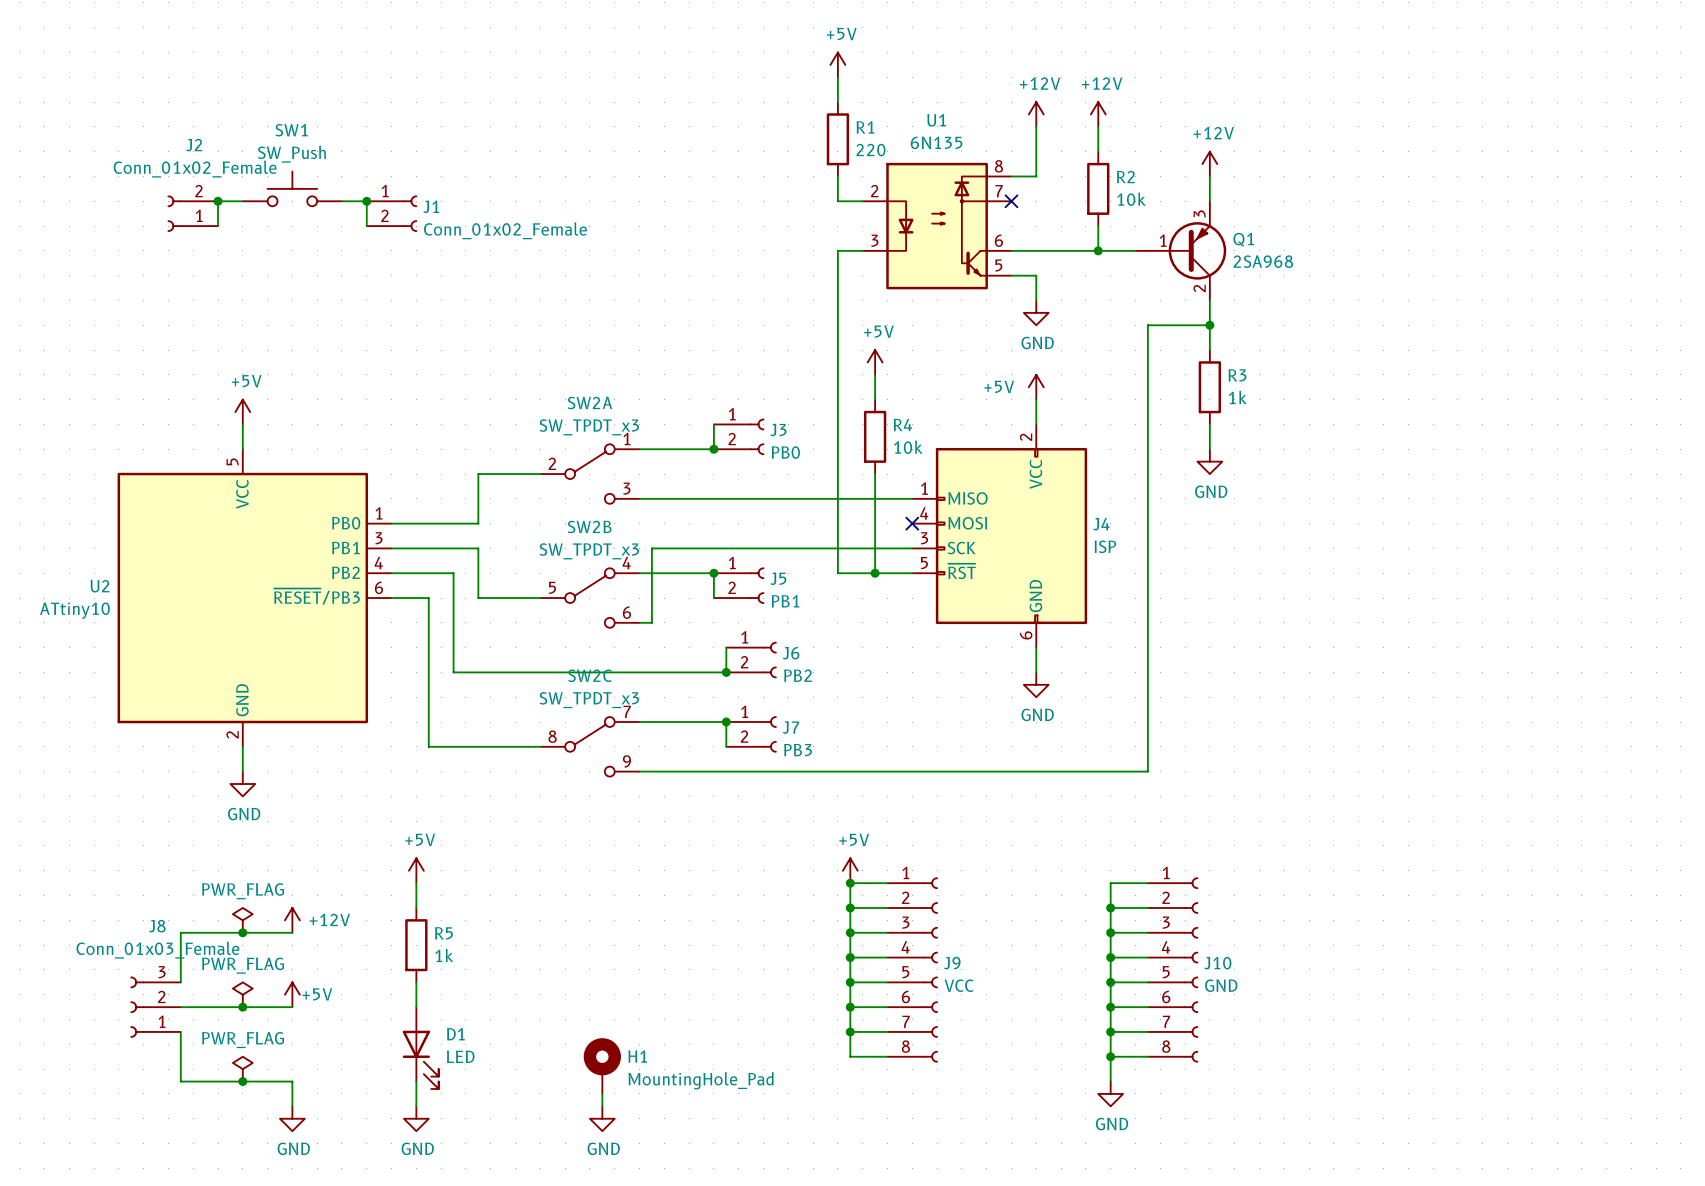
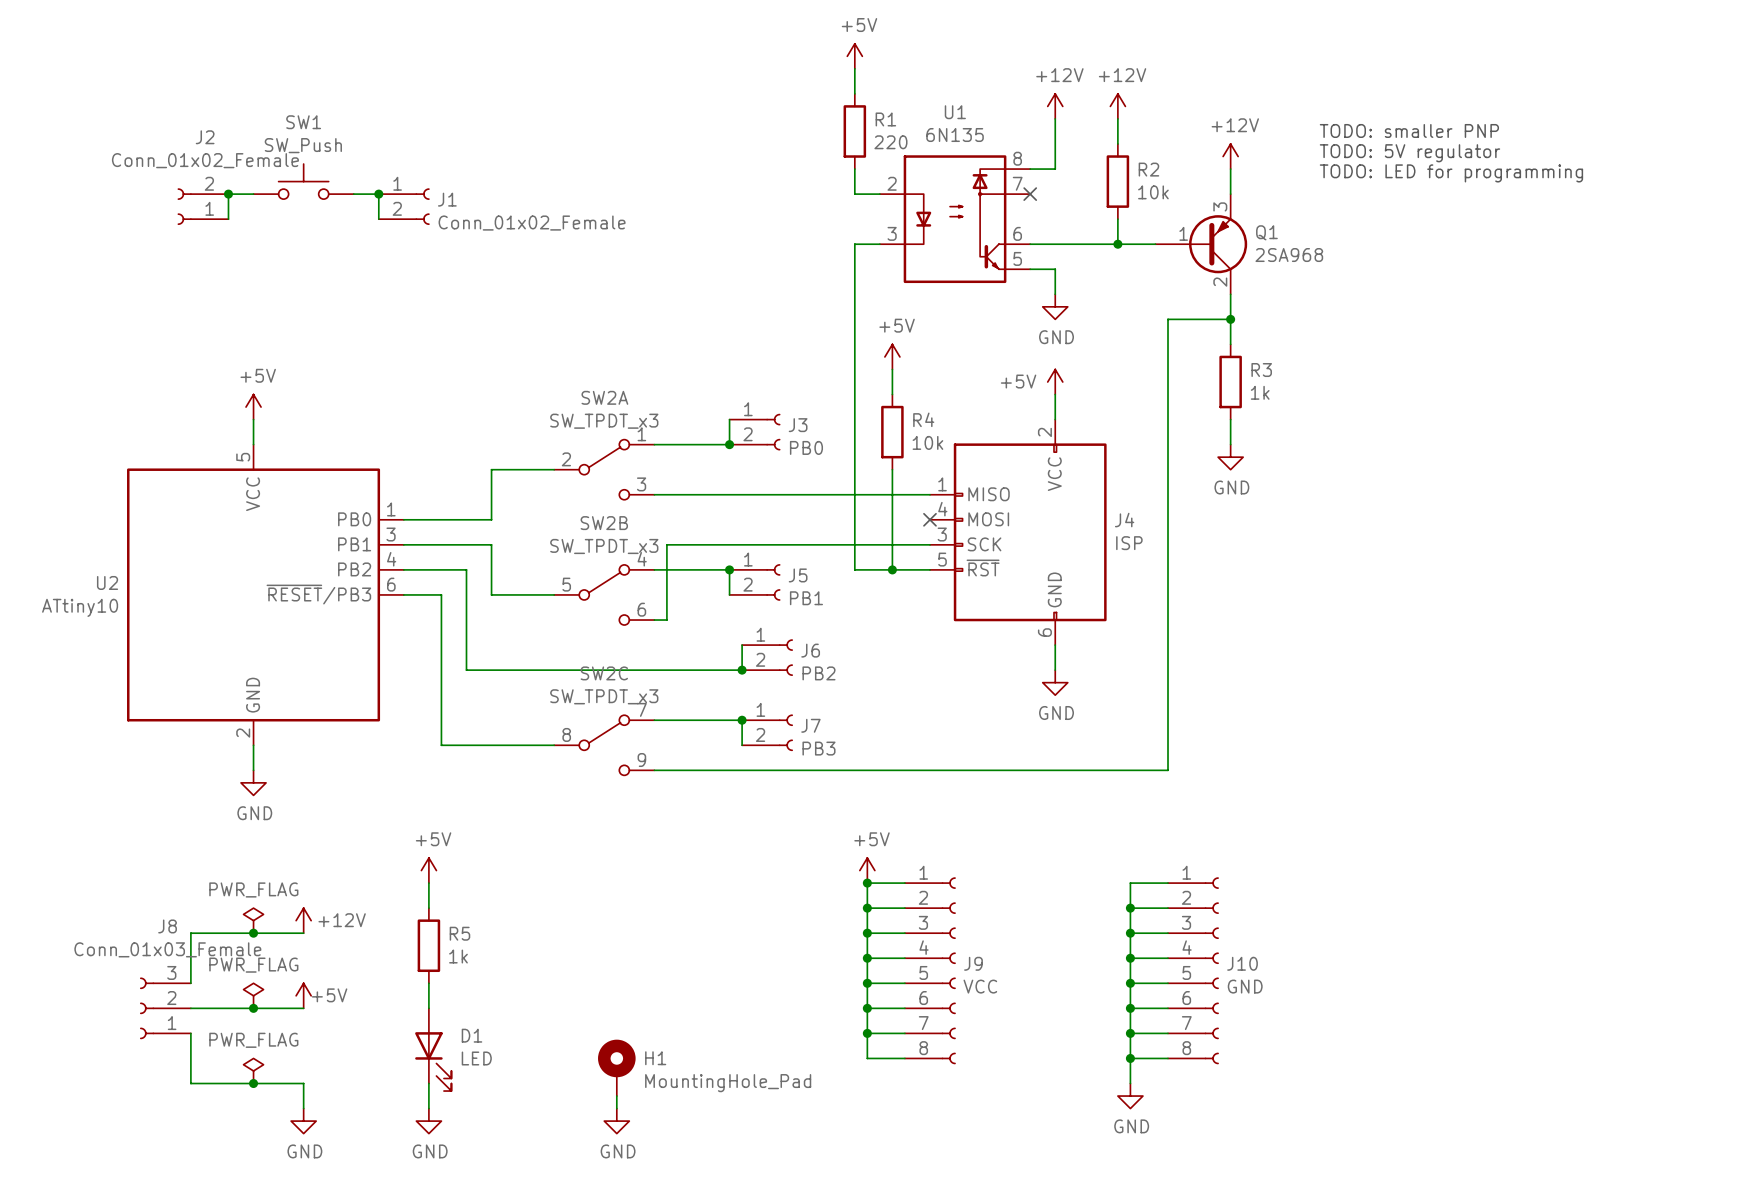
text: none -> TODO: smaller PNP (1409, 130)
text: none -> TODO: 5V regulator (1409, 153)
text: none -> TODO: LED for programming (1451, 173)

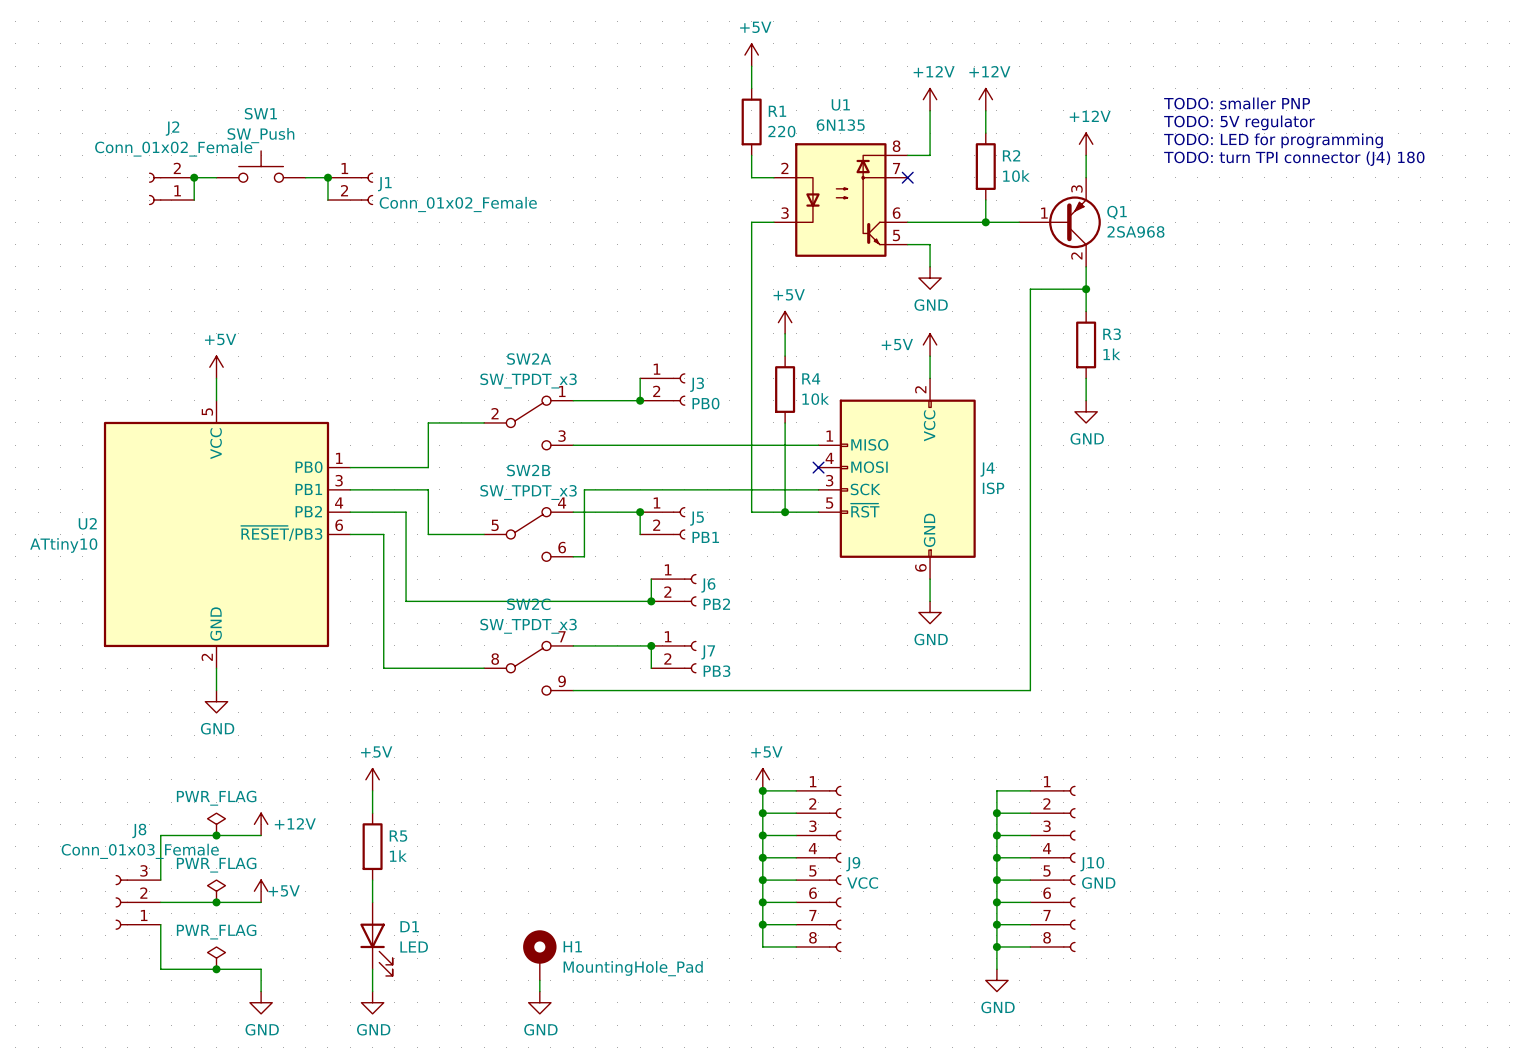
text: none -> TODO: smaller PNP (1237, 103)
text: TODO: smaller PNP (1409, 130) -> TODO: 5V regulator (1239, 122)
text: TODO: 5V regulator (1409, 153) -> TODO: LED for programming (1273, 140)
text: TODO: LED for programming (1451, 173) -> TODO: turn TPI connector (J4) 180 (1294, 158)

